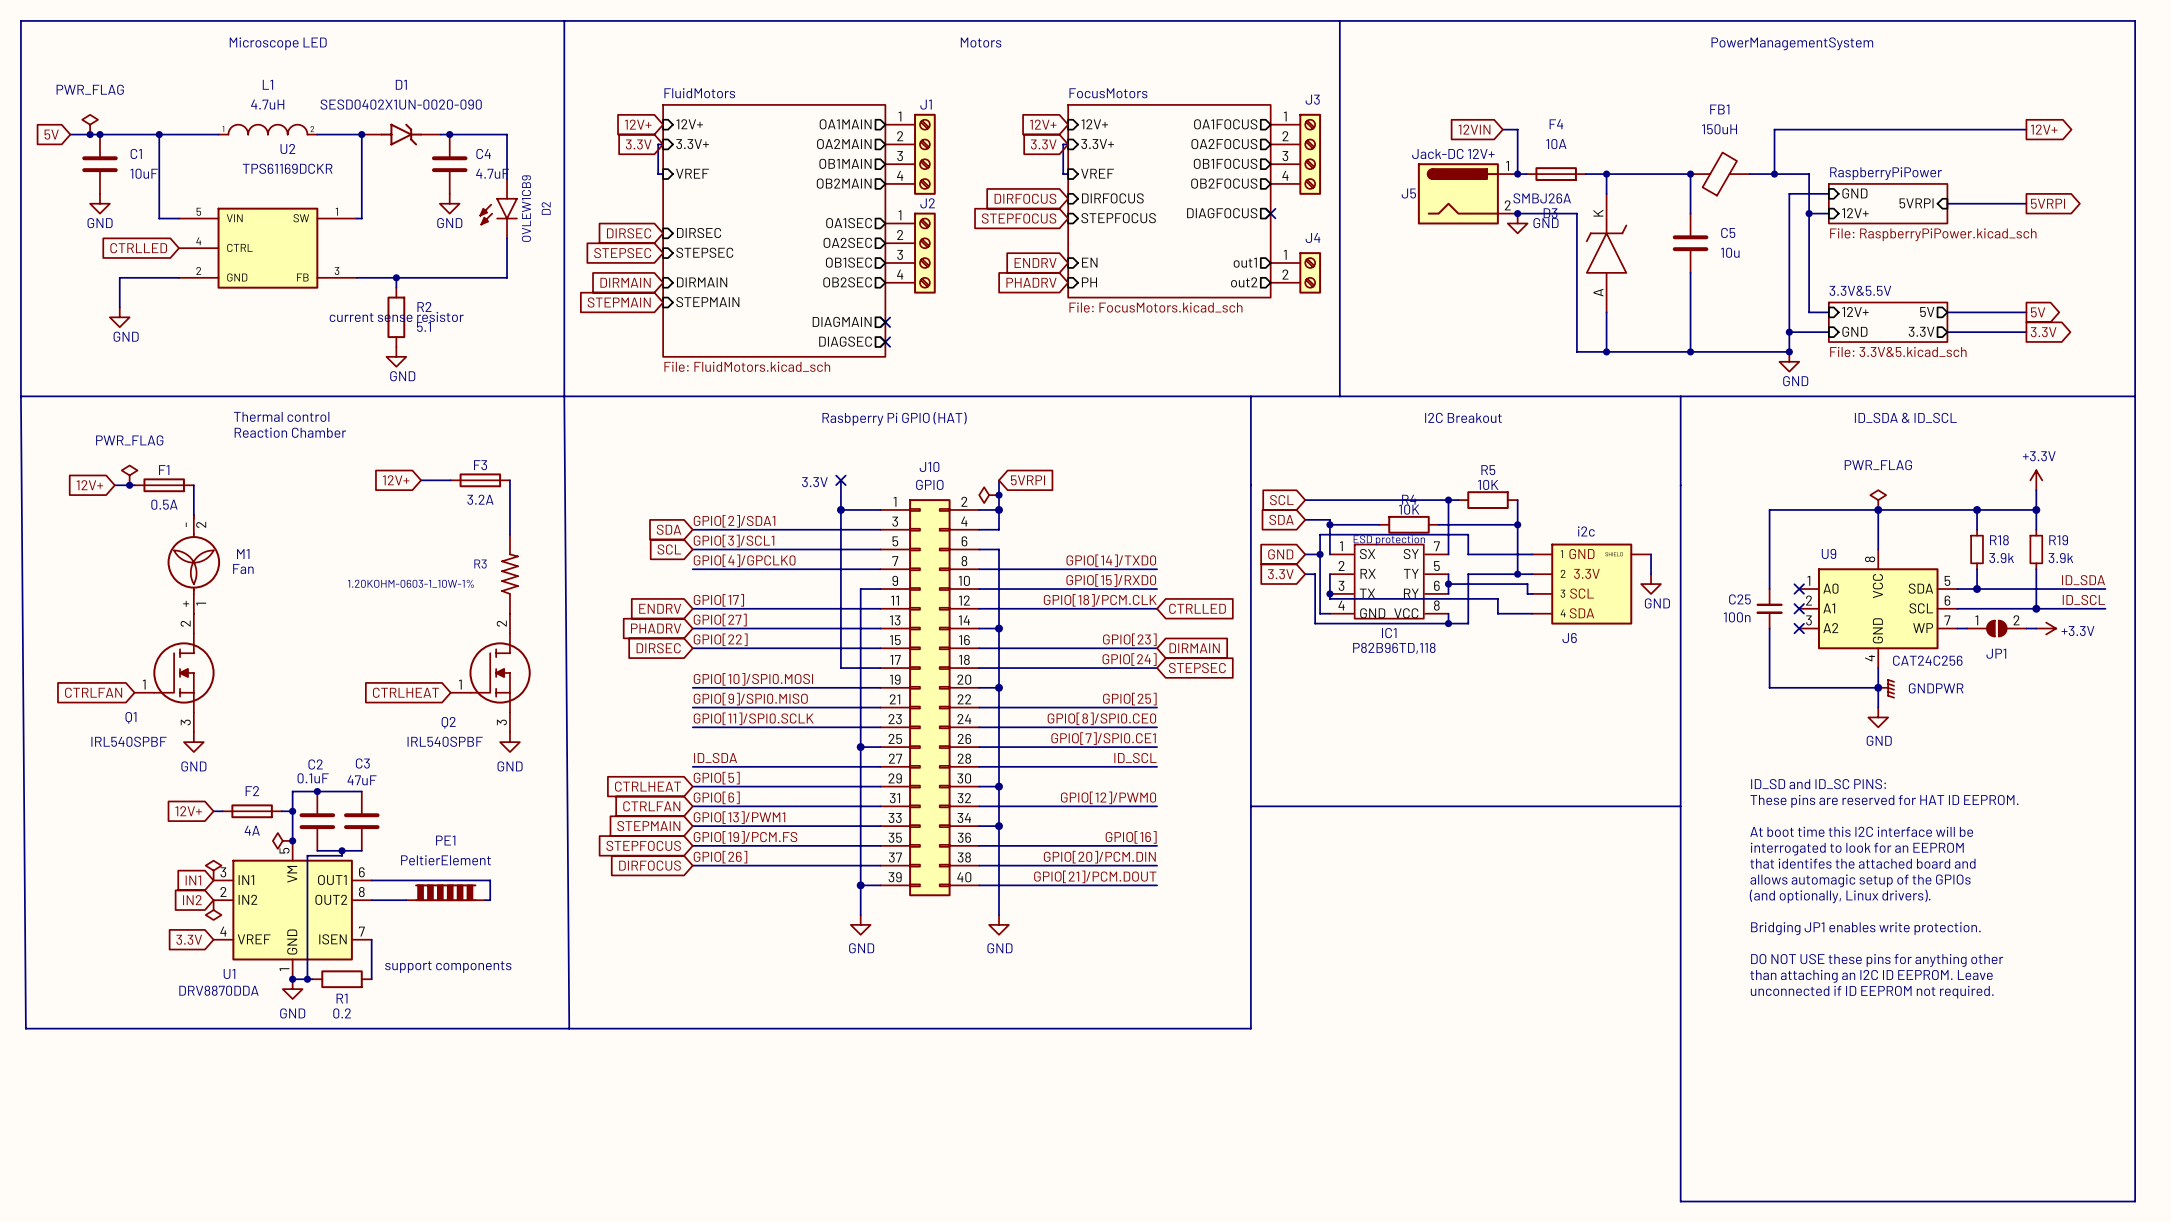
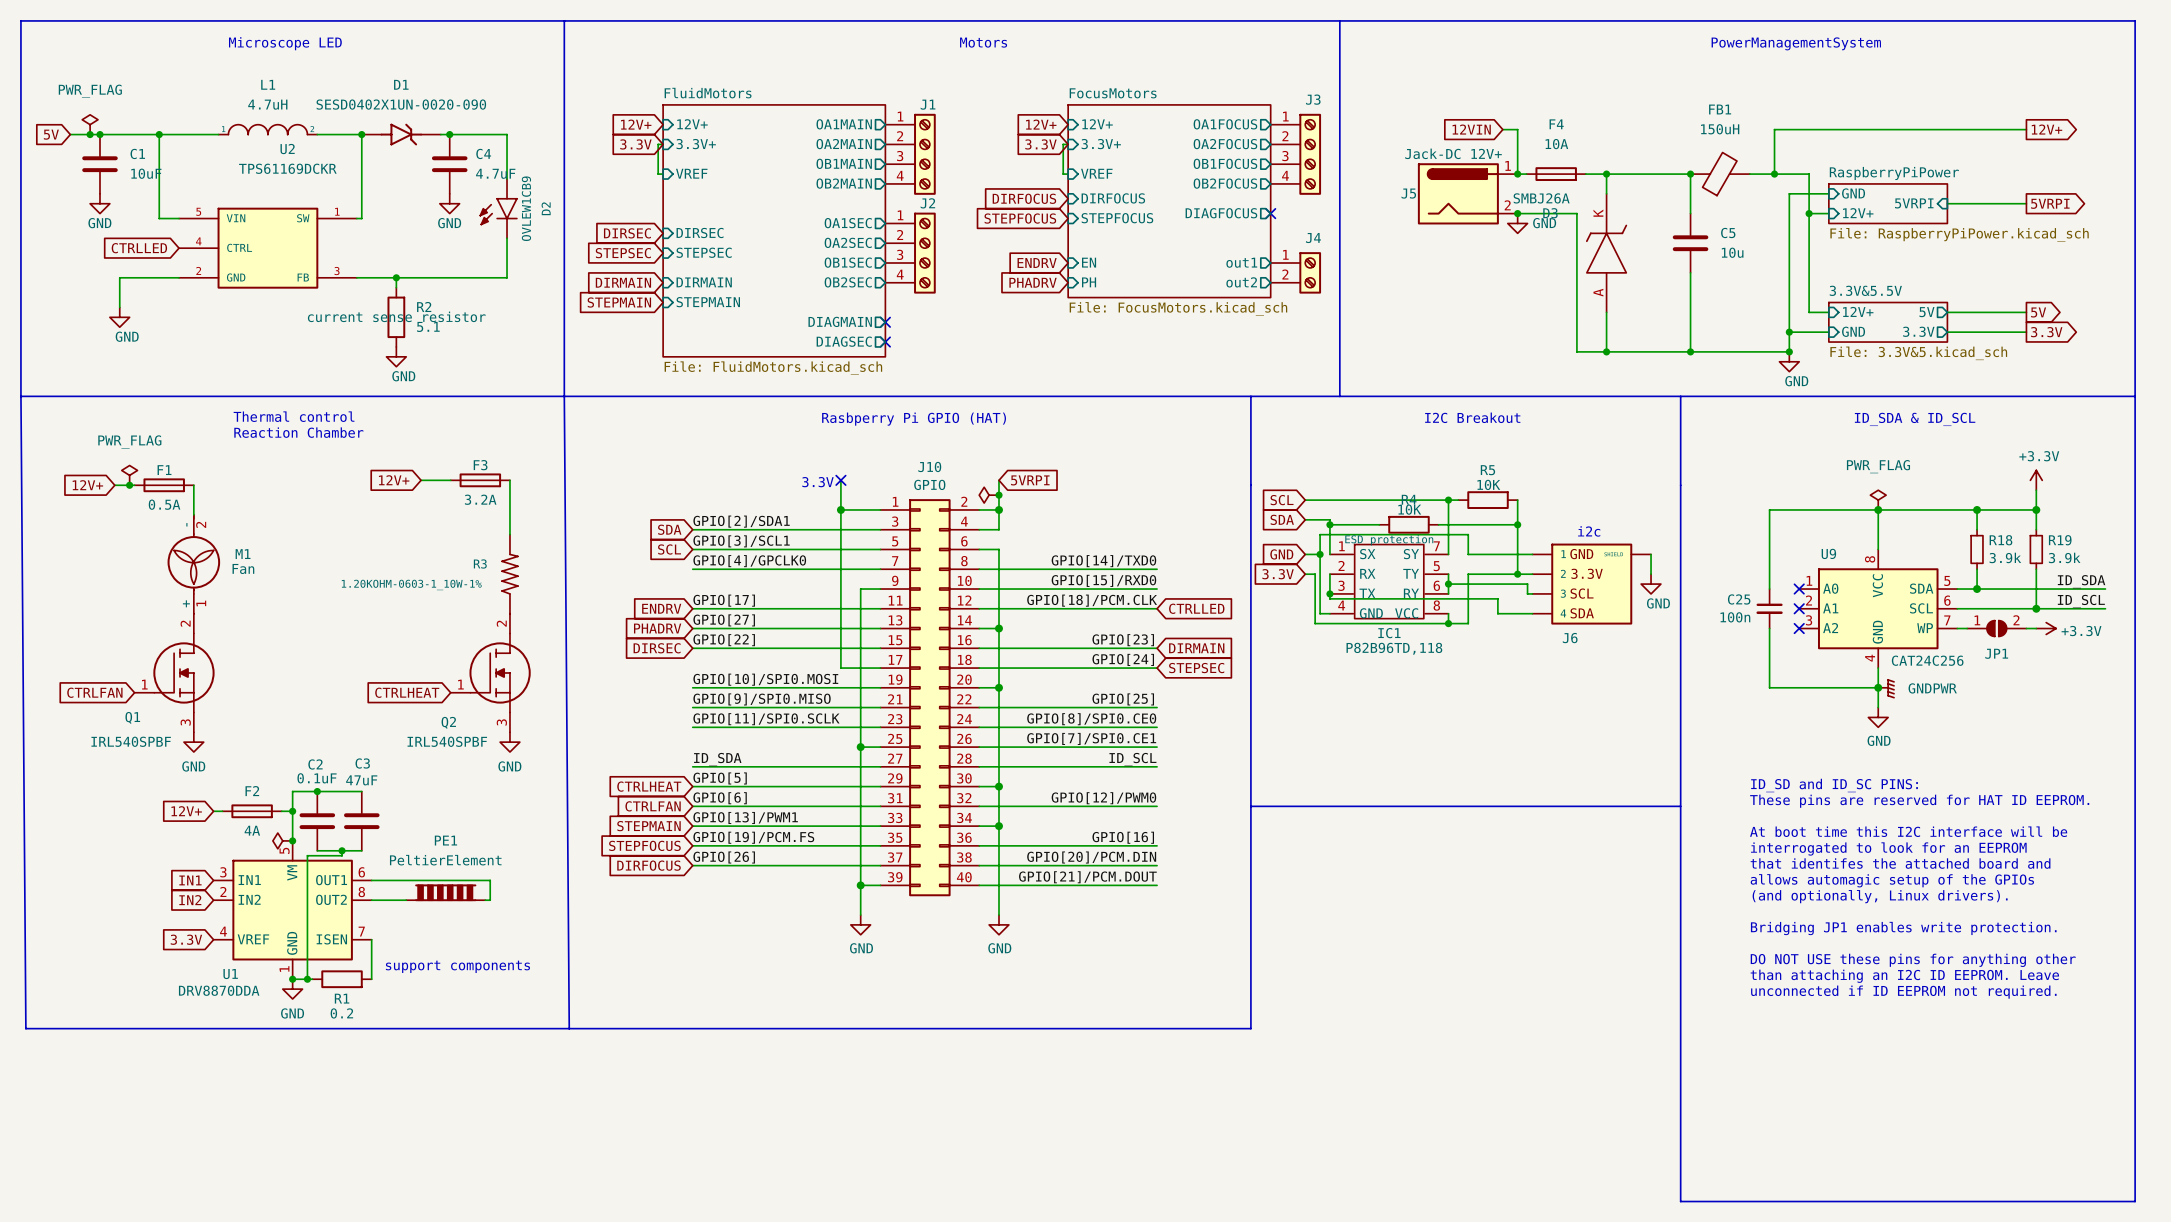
power symbol: (213, 870) -> none
power symbol: (213, 910) -> none

